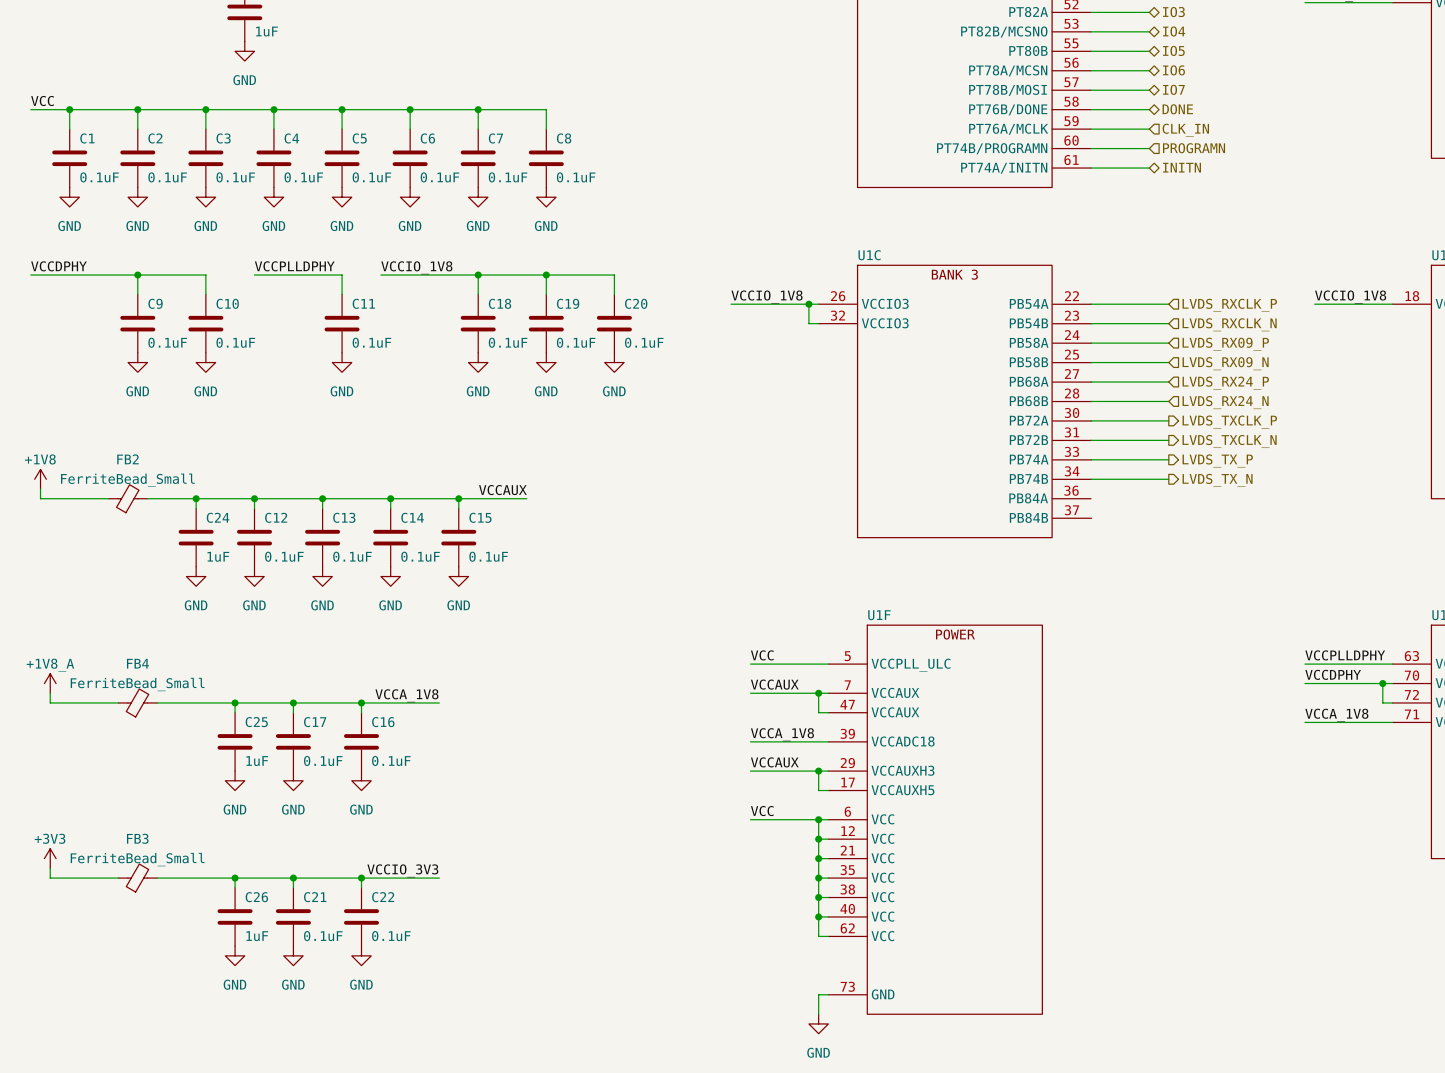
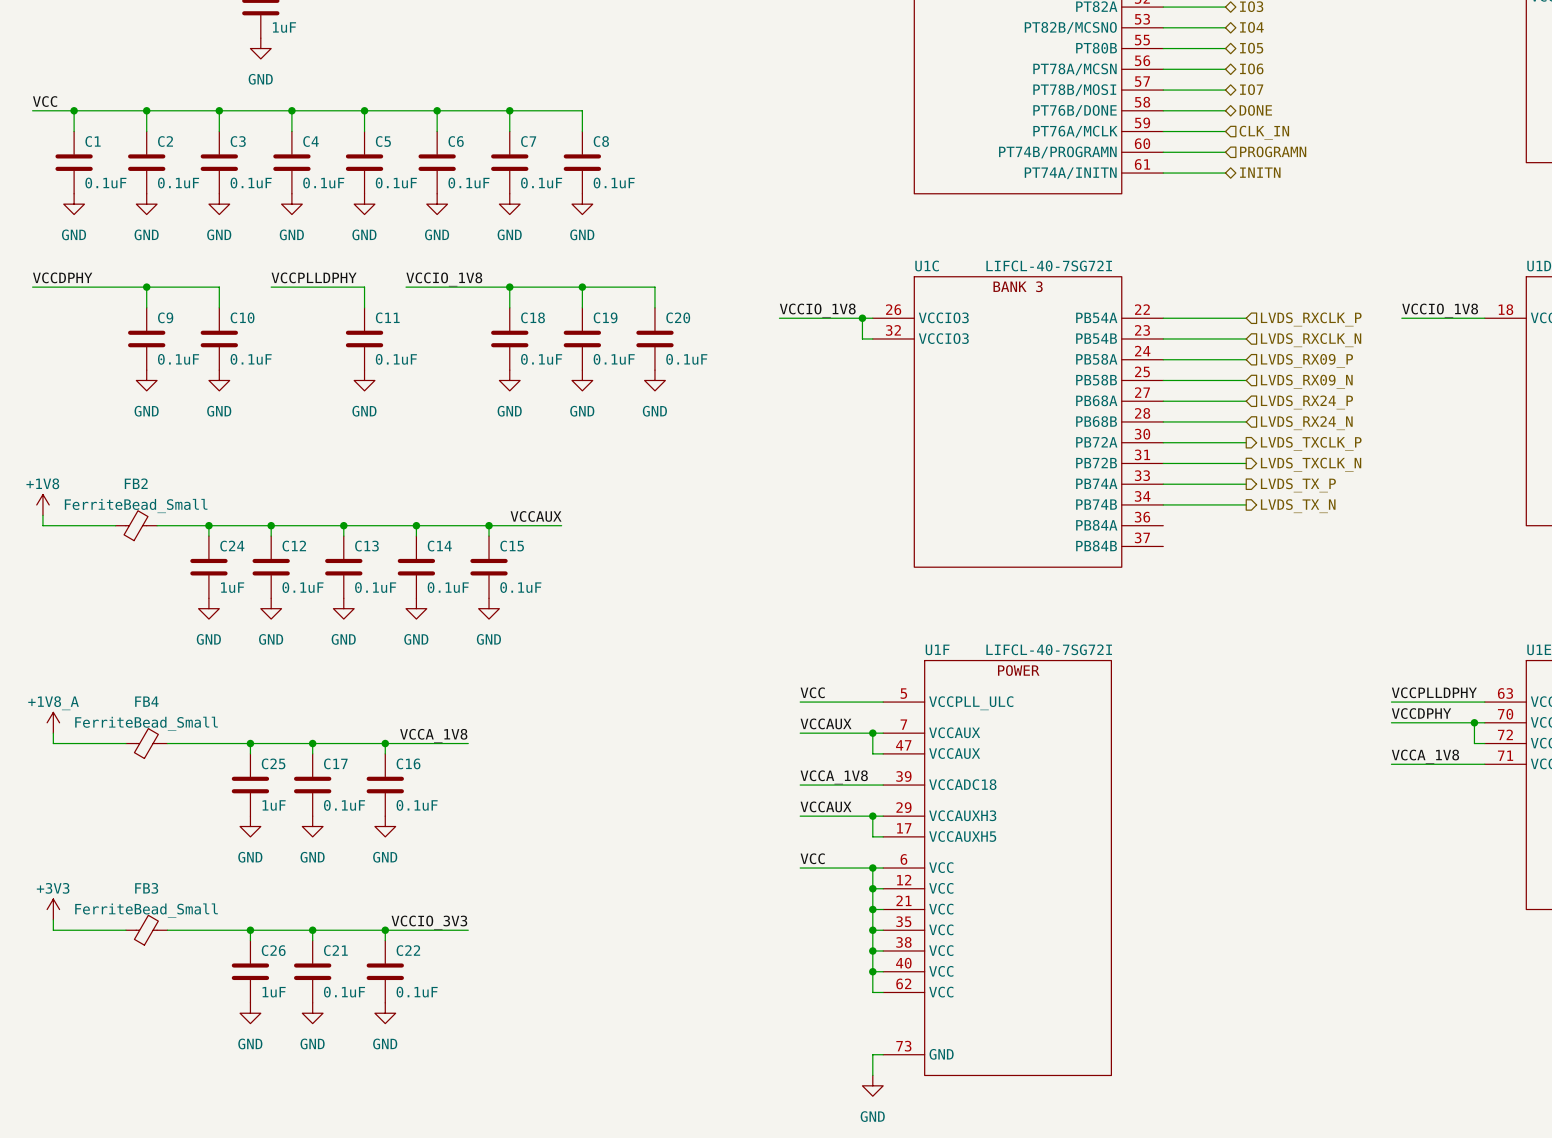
U1C value: none -> LIFCL-40-7SG72I (1049, 266)
U1C symbol: [818, 265, 1092, 538] -> [872, 276, 1164, 568]
U1F value: none -> LIFCL-40-7SG72I (1049, 649)

